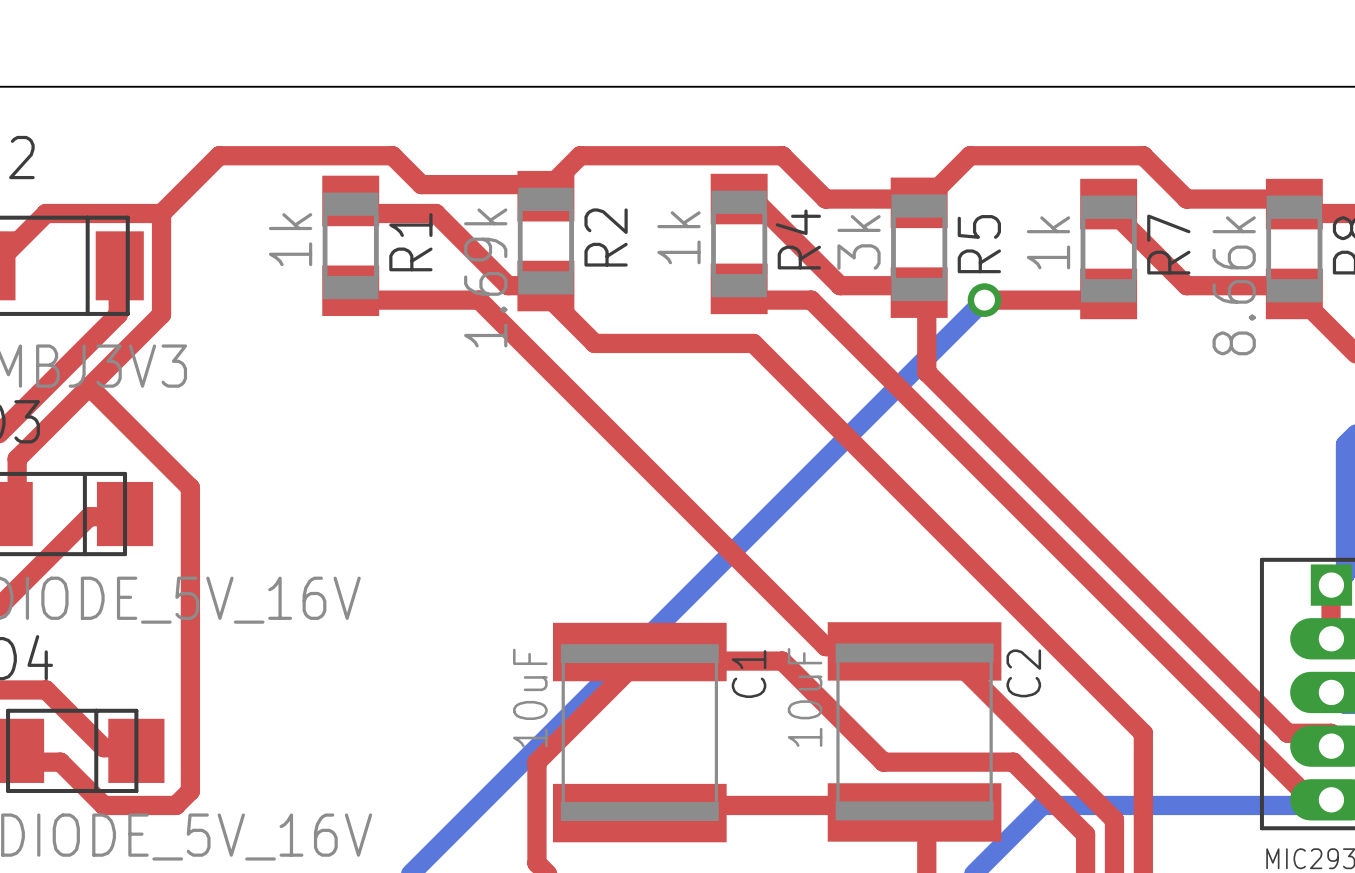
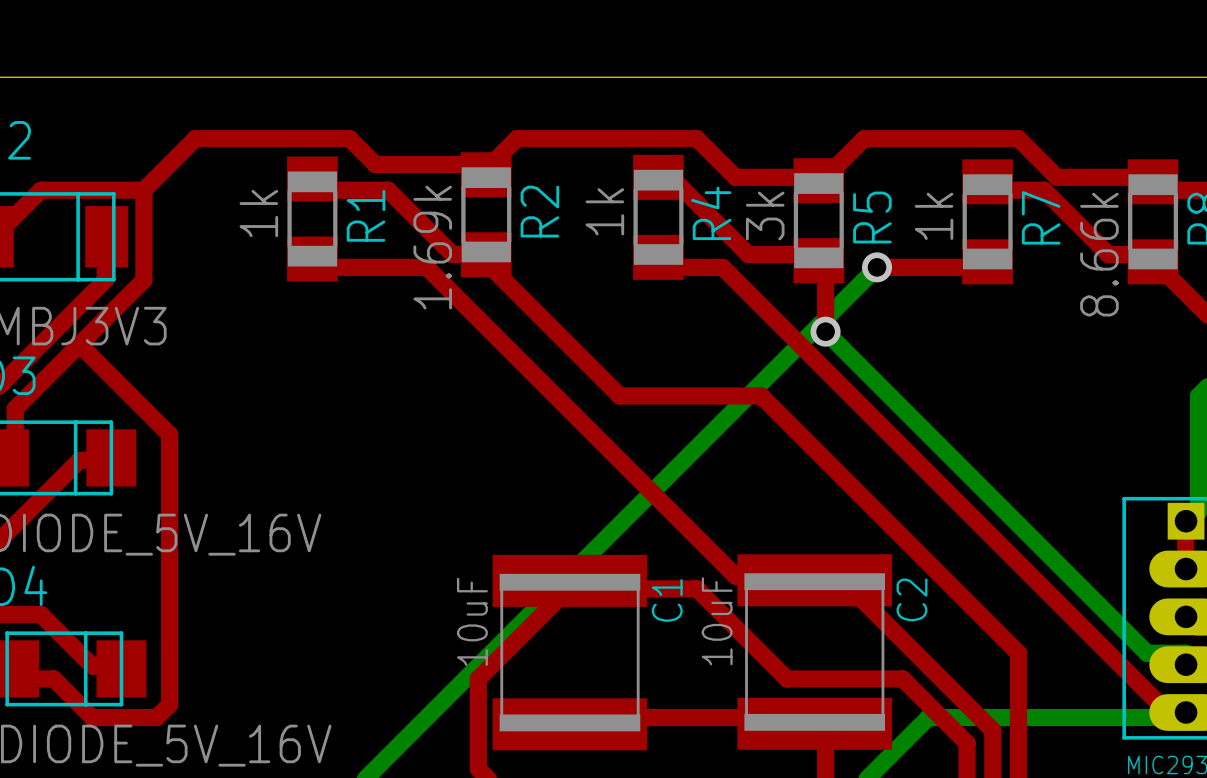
top track: (1114, 213) (1186, 285) (1244, 285) -> (992, 190) (1044, 190) (1108, 254)
top track: (594, 343) (753, 343) (854, 444) -> (529, 305) (619, 395) (761, 395)
top track: (926, 372) (1287, 733) (1331, 733) (1331, 746) -> none
bottom track: none -> (825, 331) (1147, 653) (1185, 653) (1186, 664)
via: none -> (825, 331)

